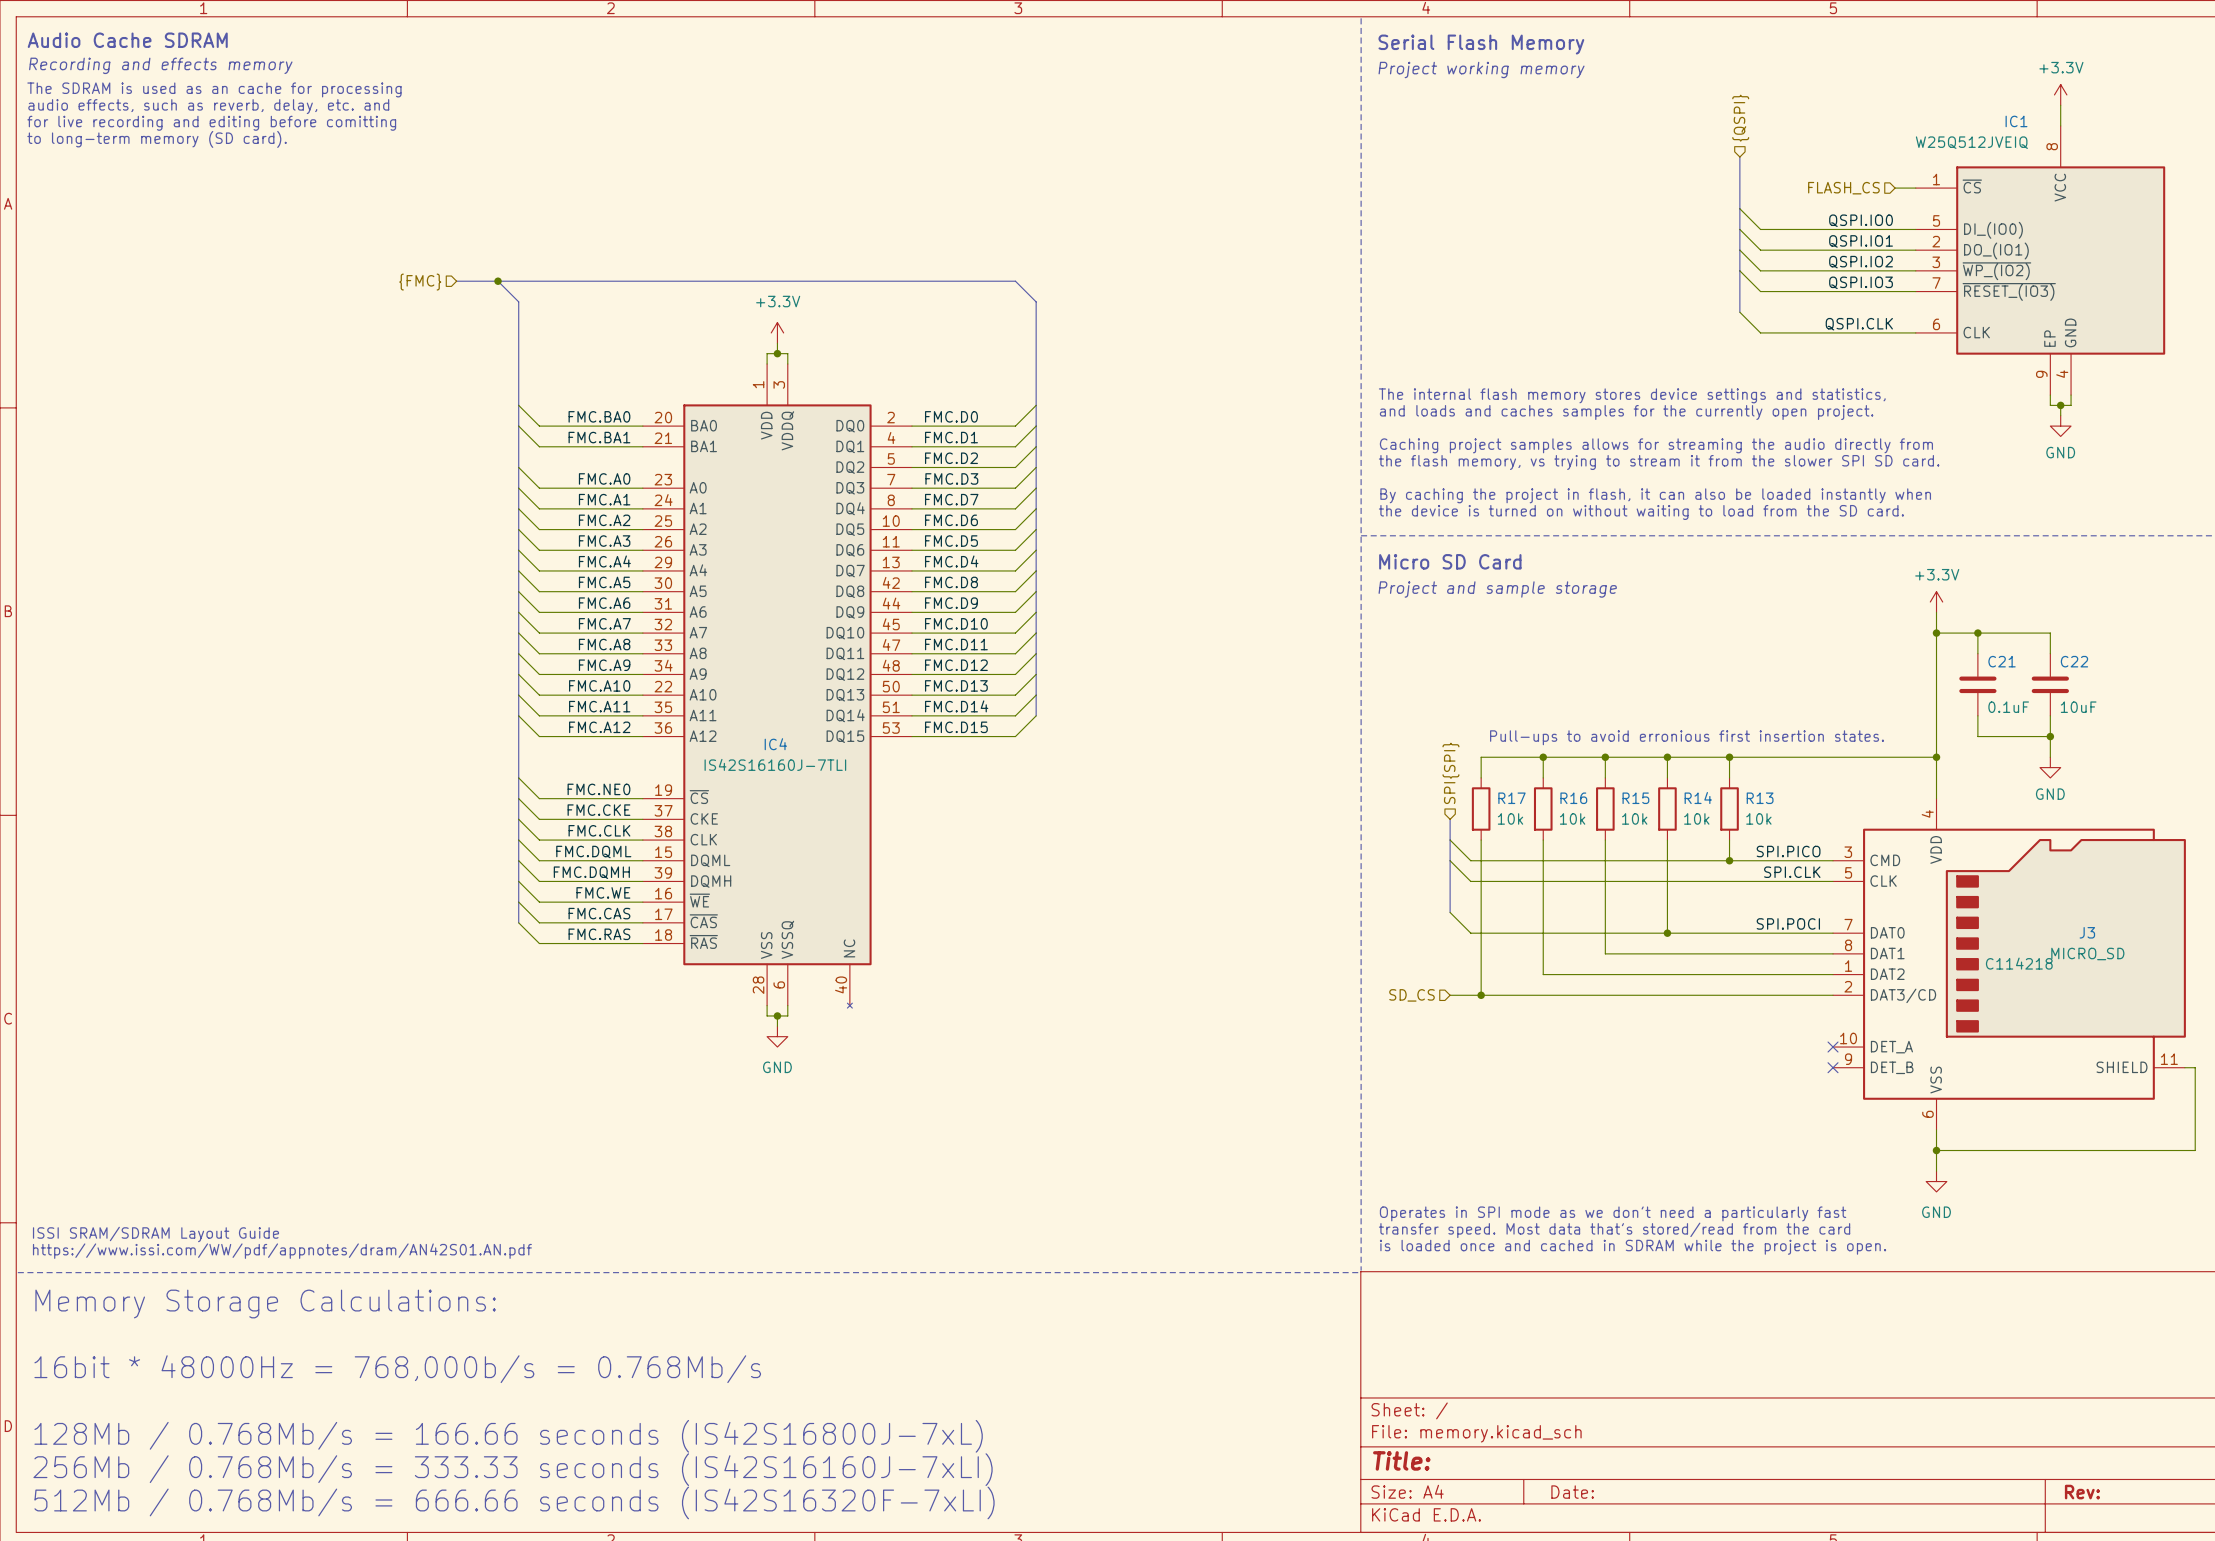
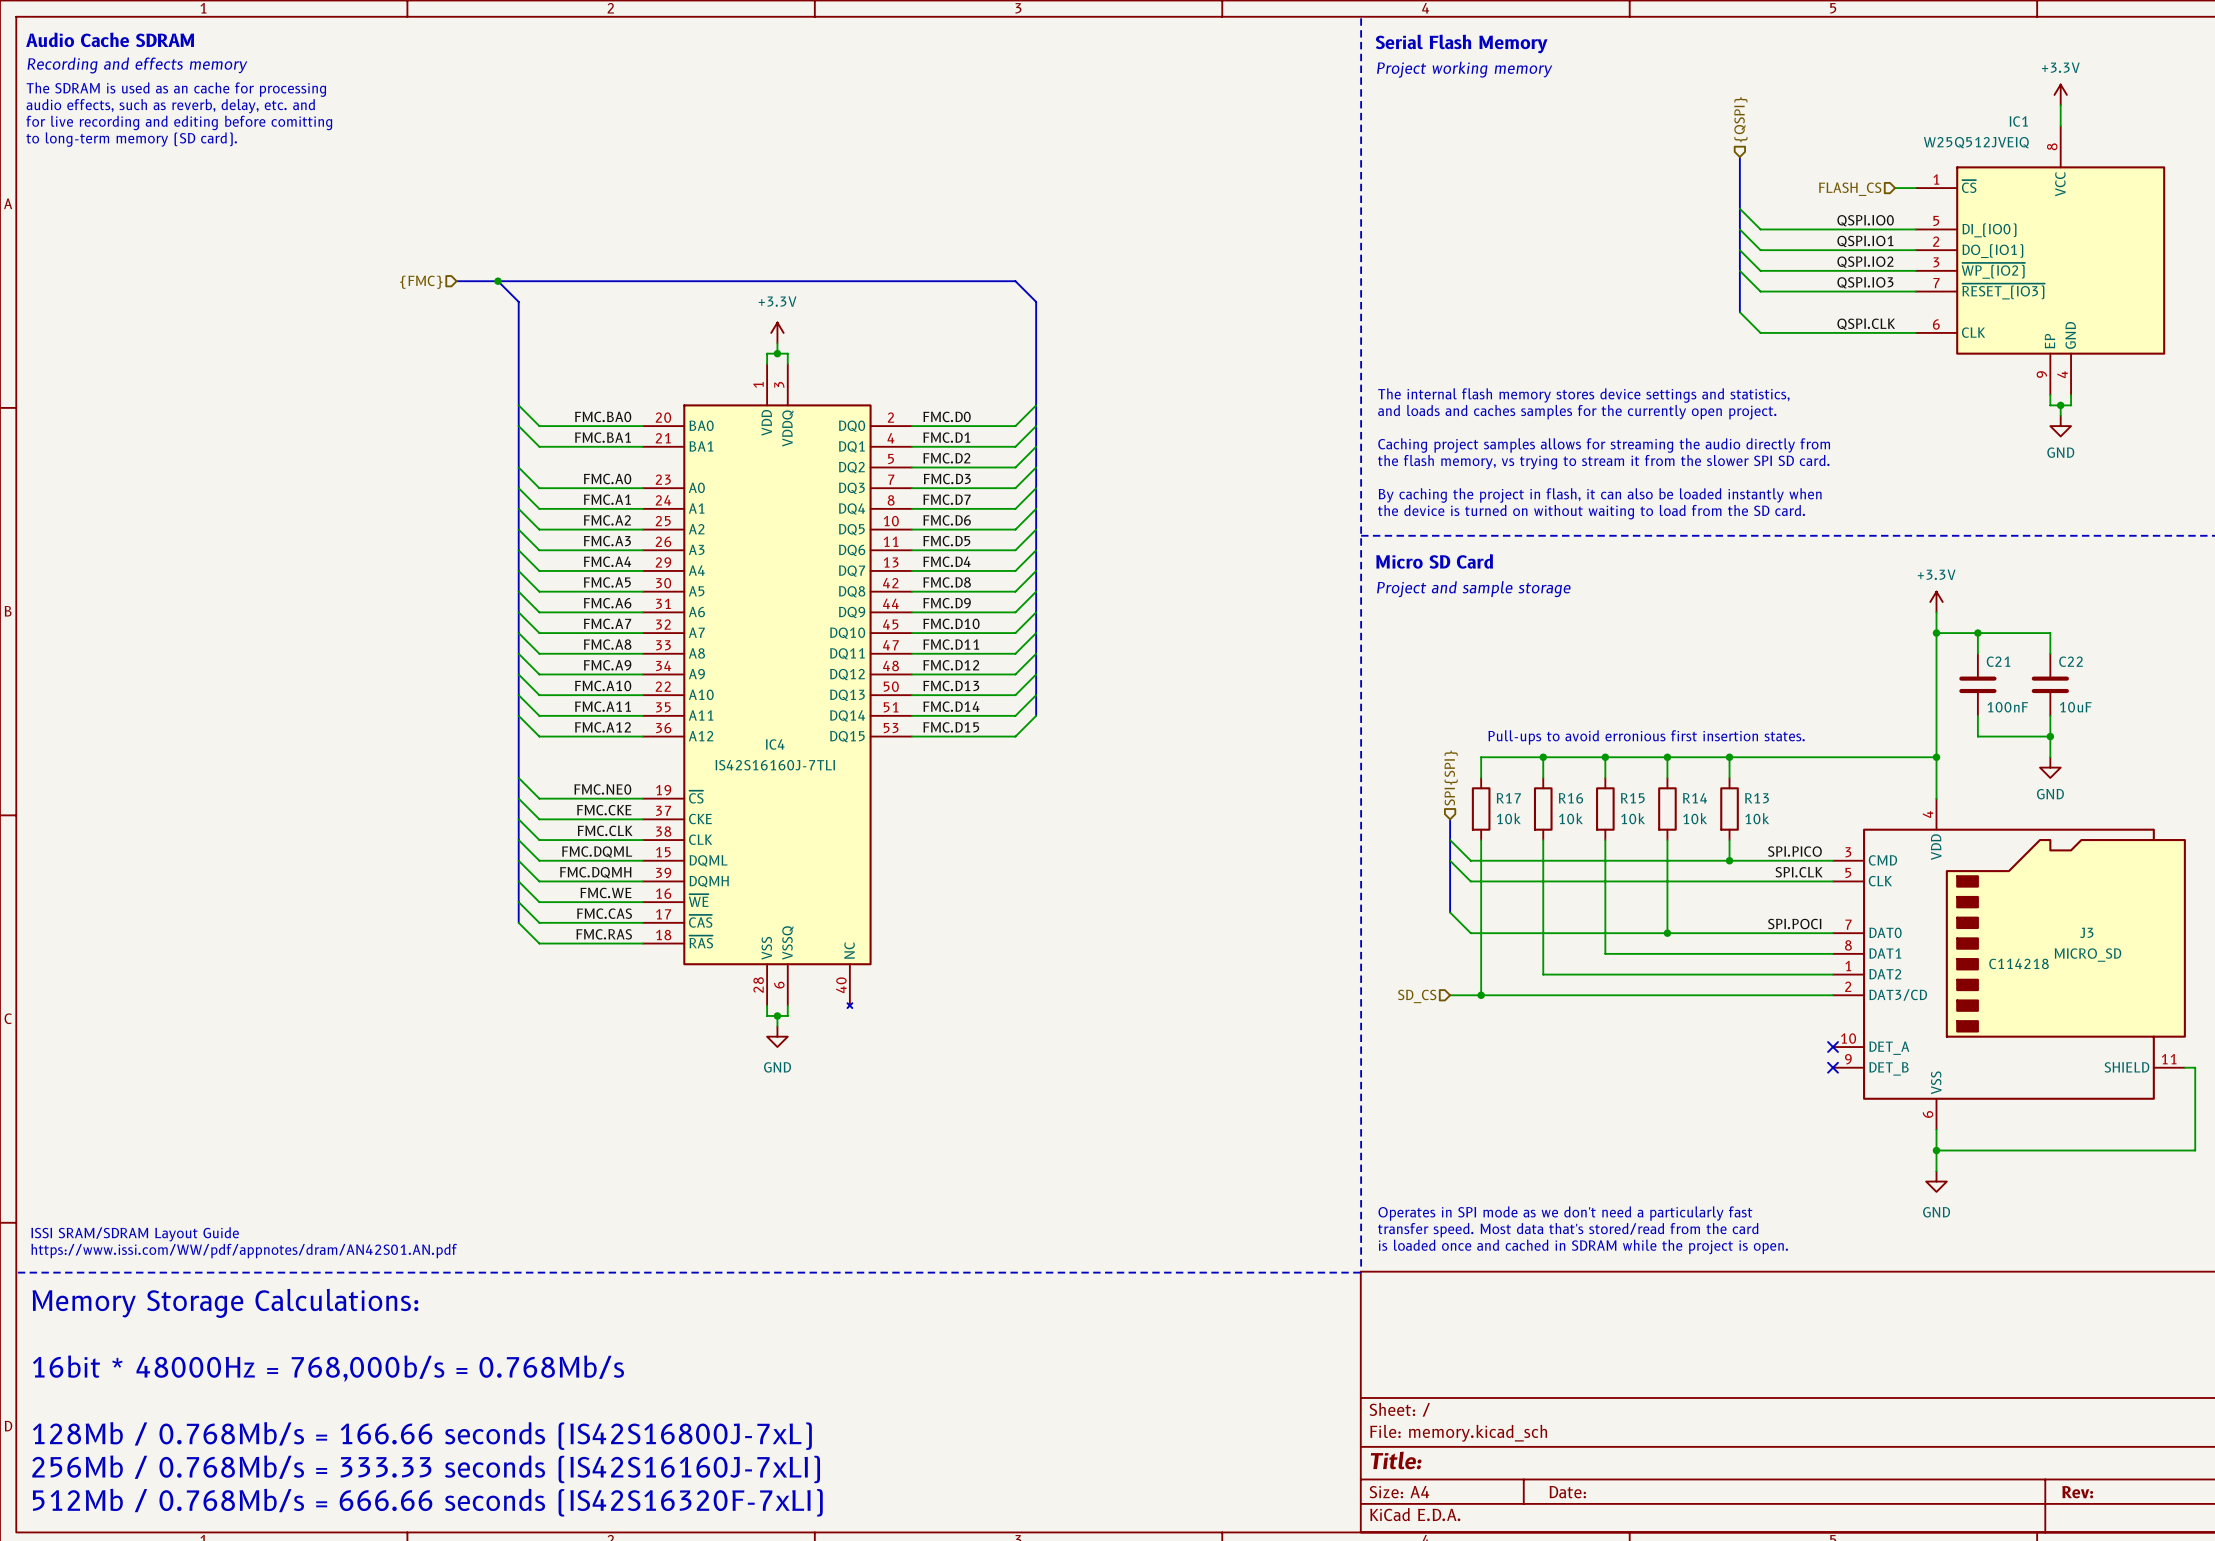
C21 value: 0.1uF (2008, 707) -> 100nF (2007, 707)

